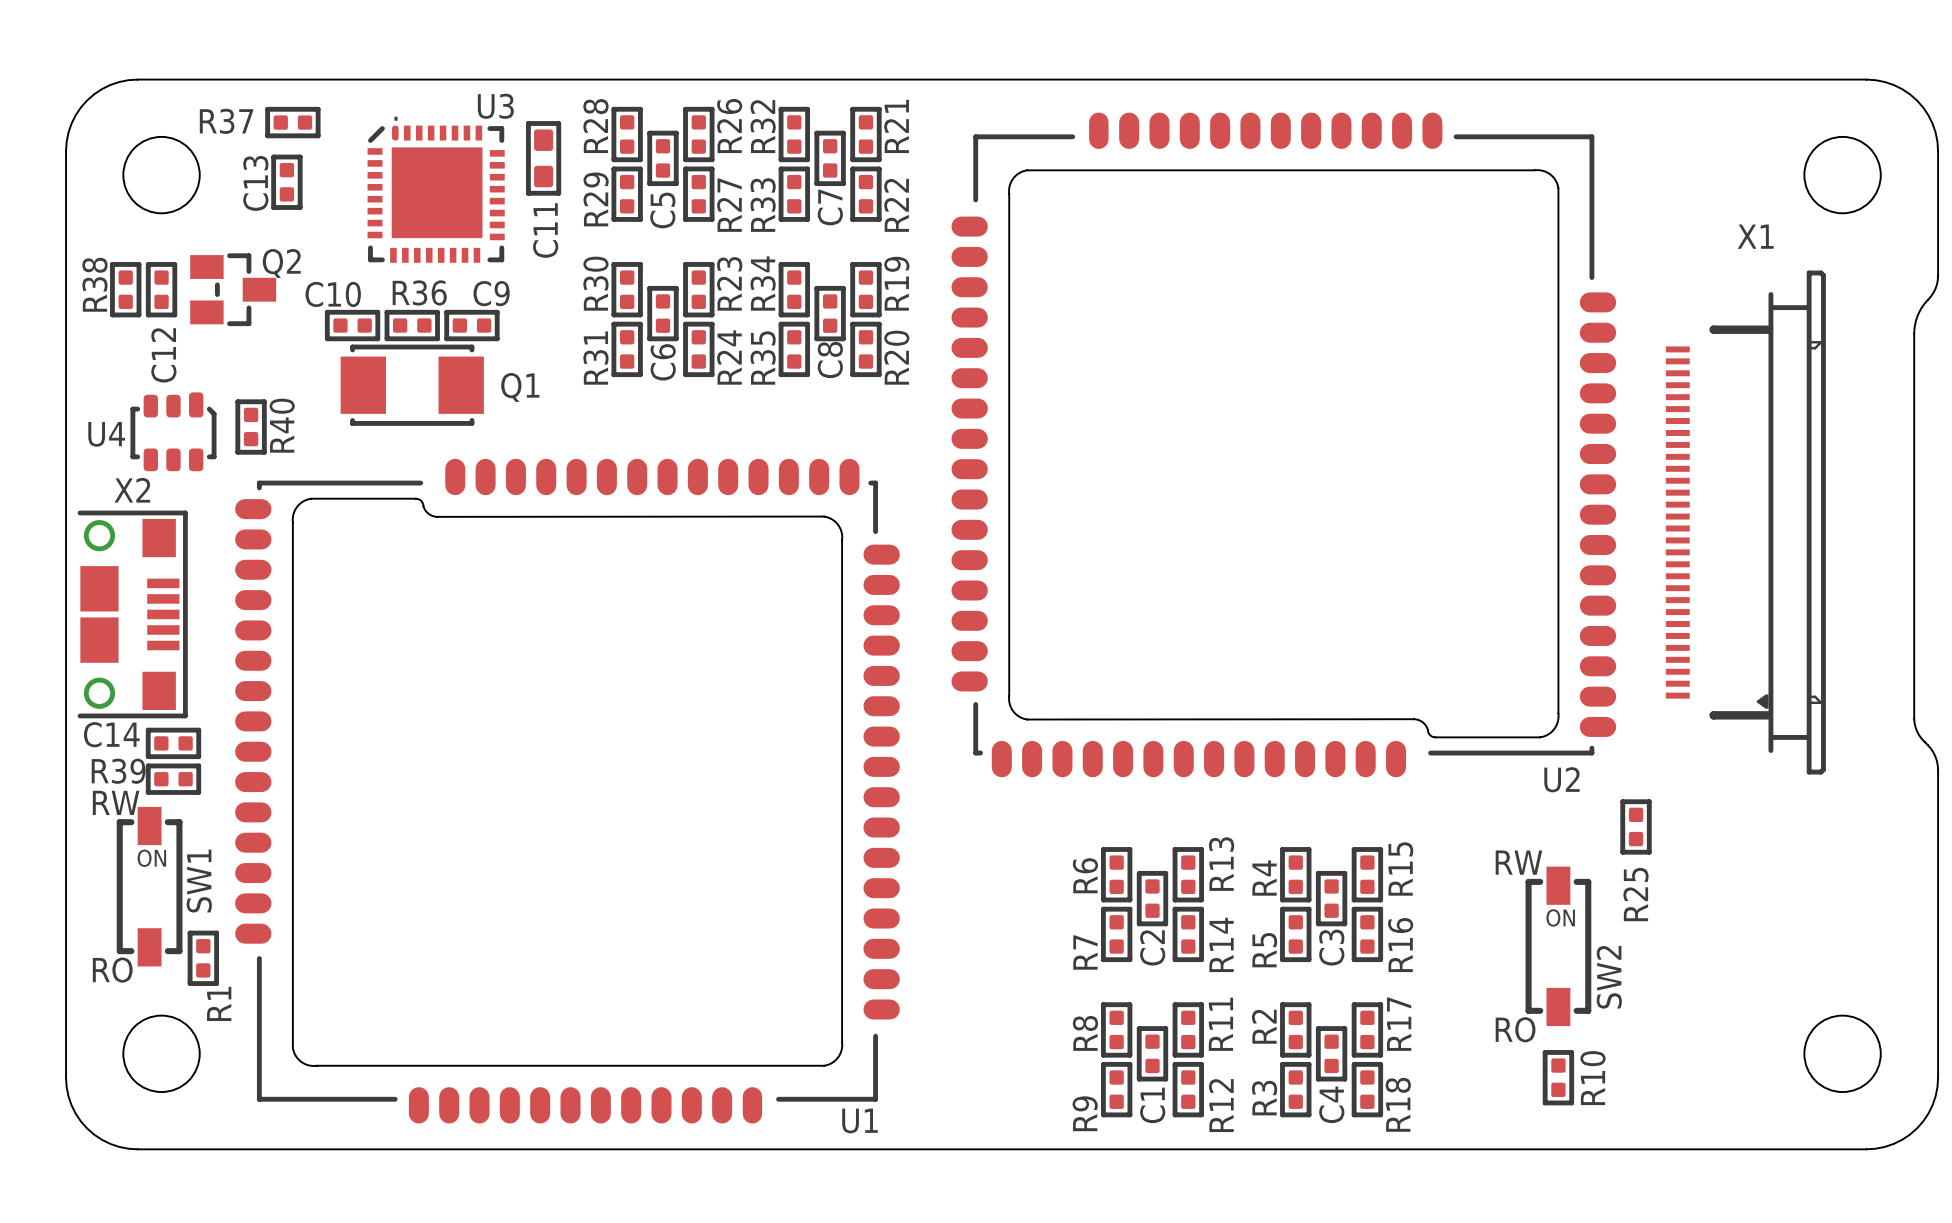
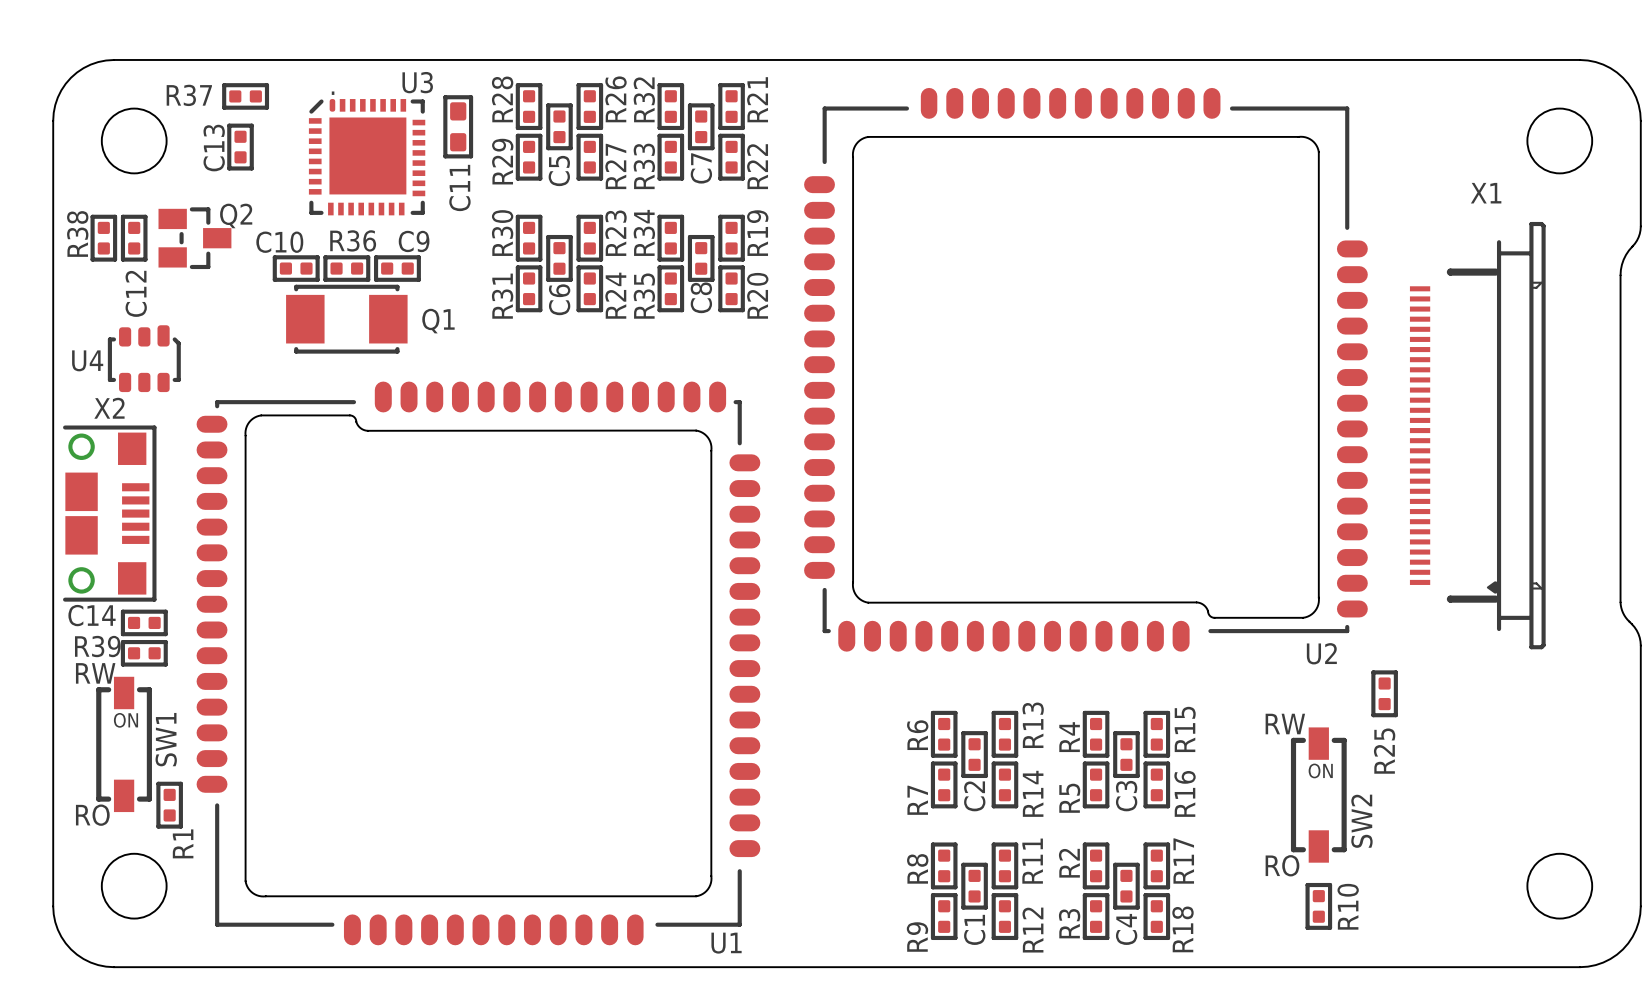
R40: (251, 427) -> none

